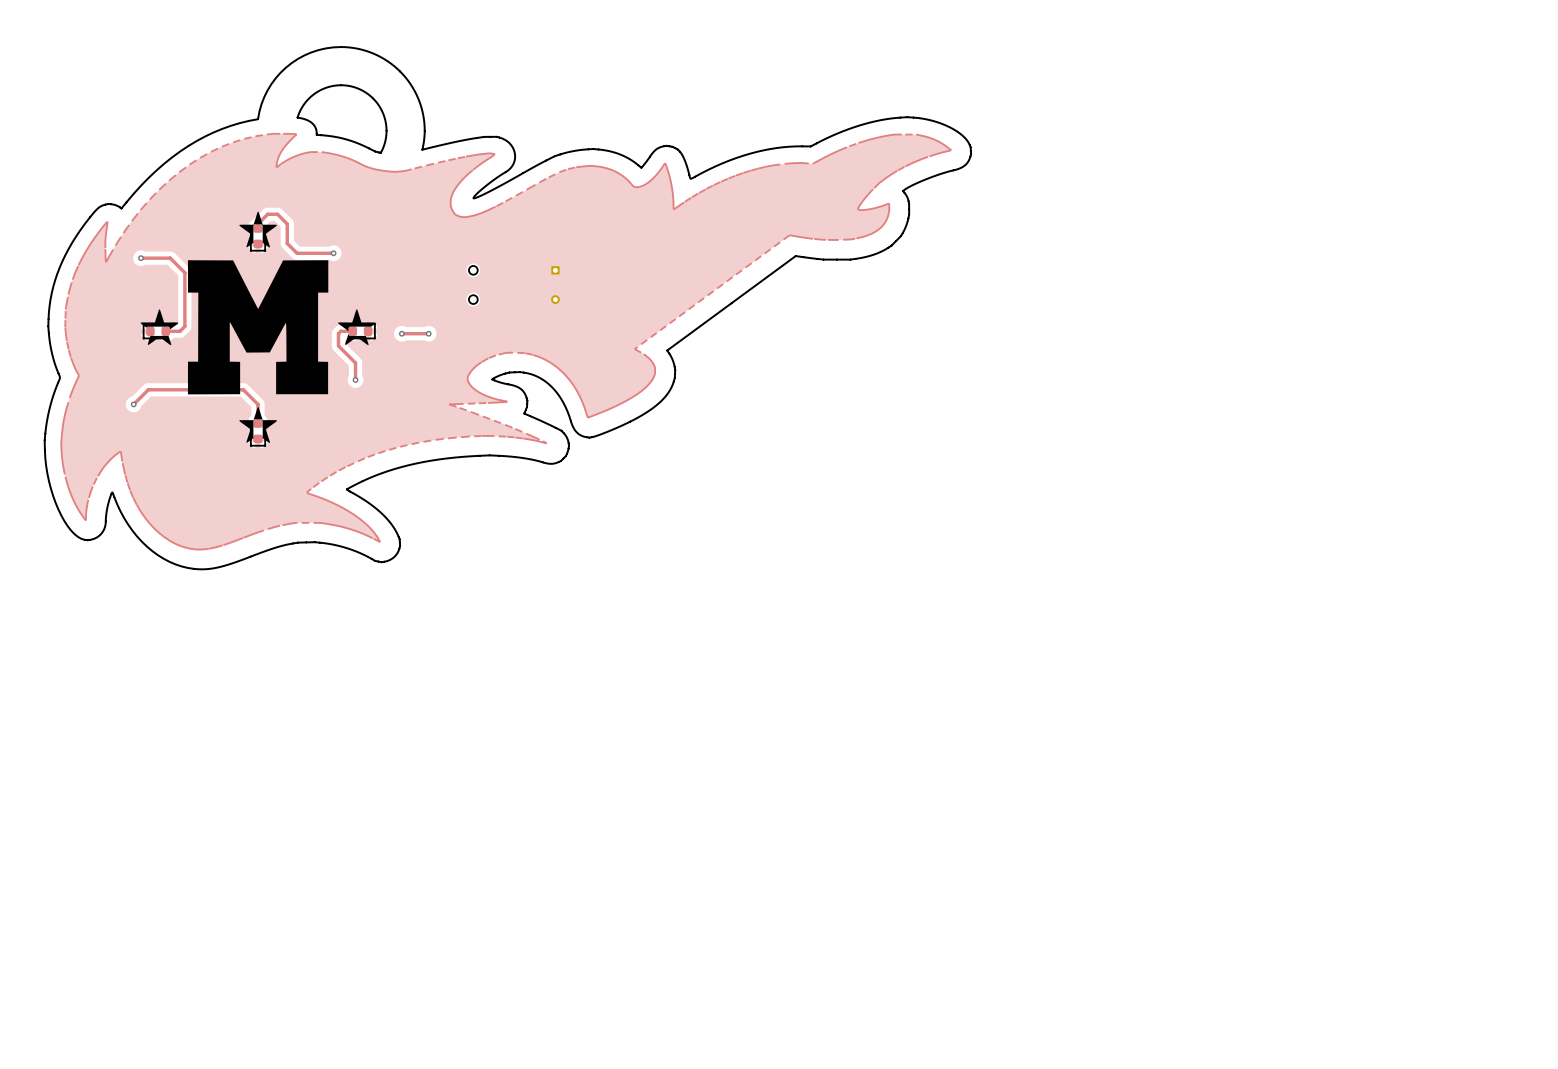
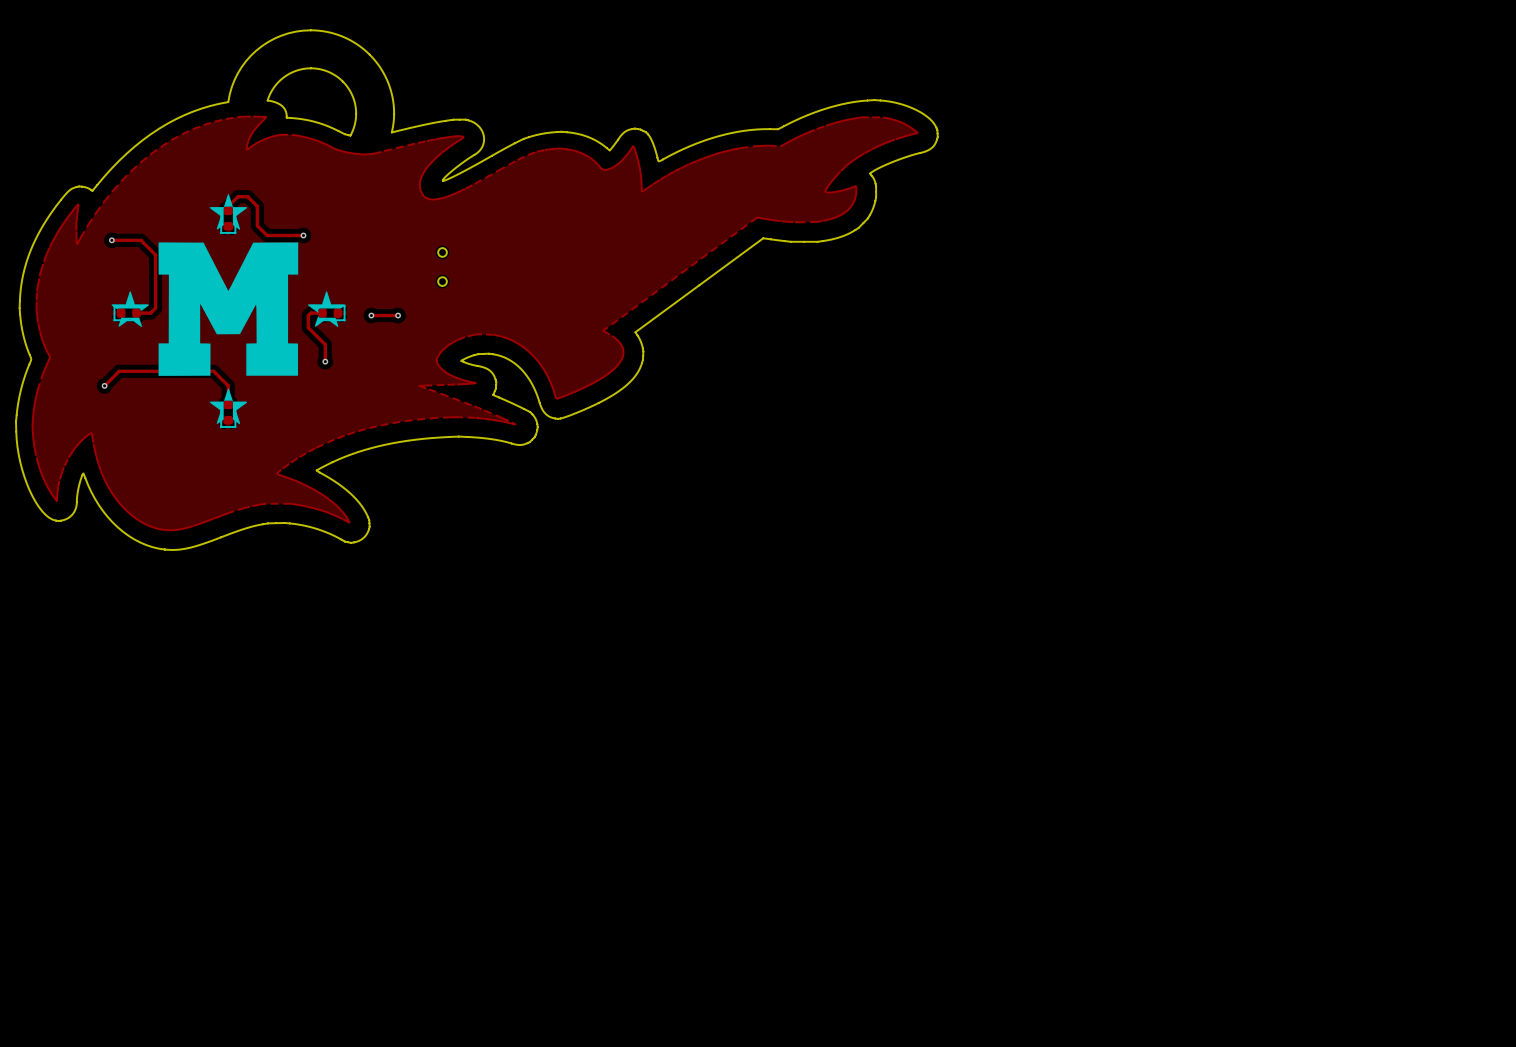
part: (555, 270) -> none
part: (555, 299) -> none

